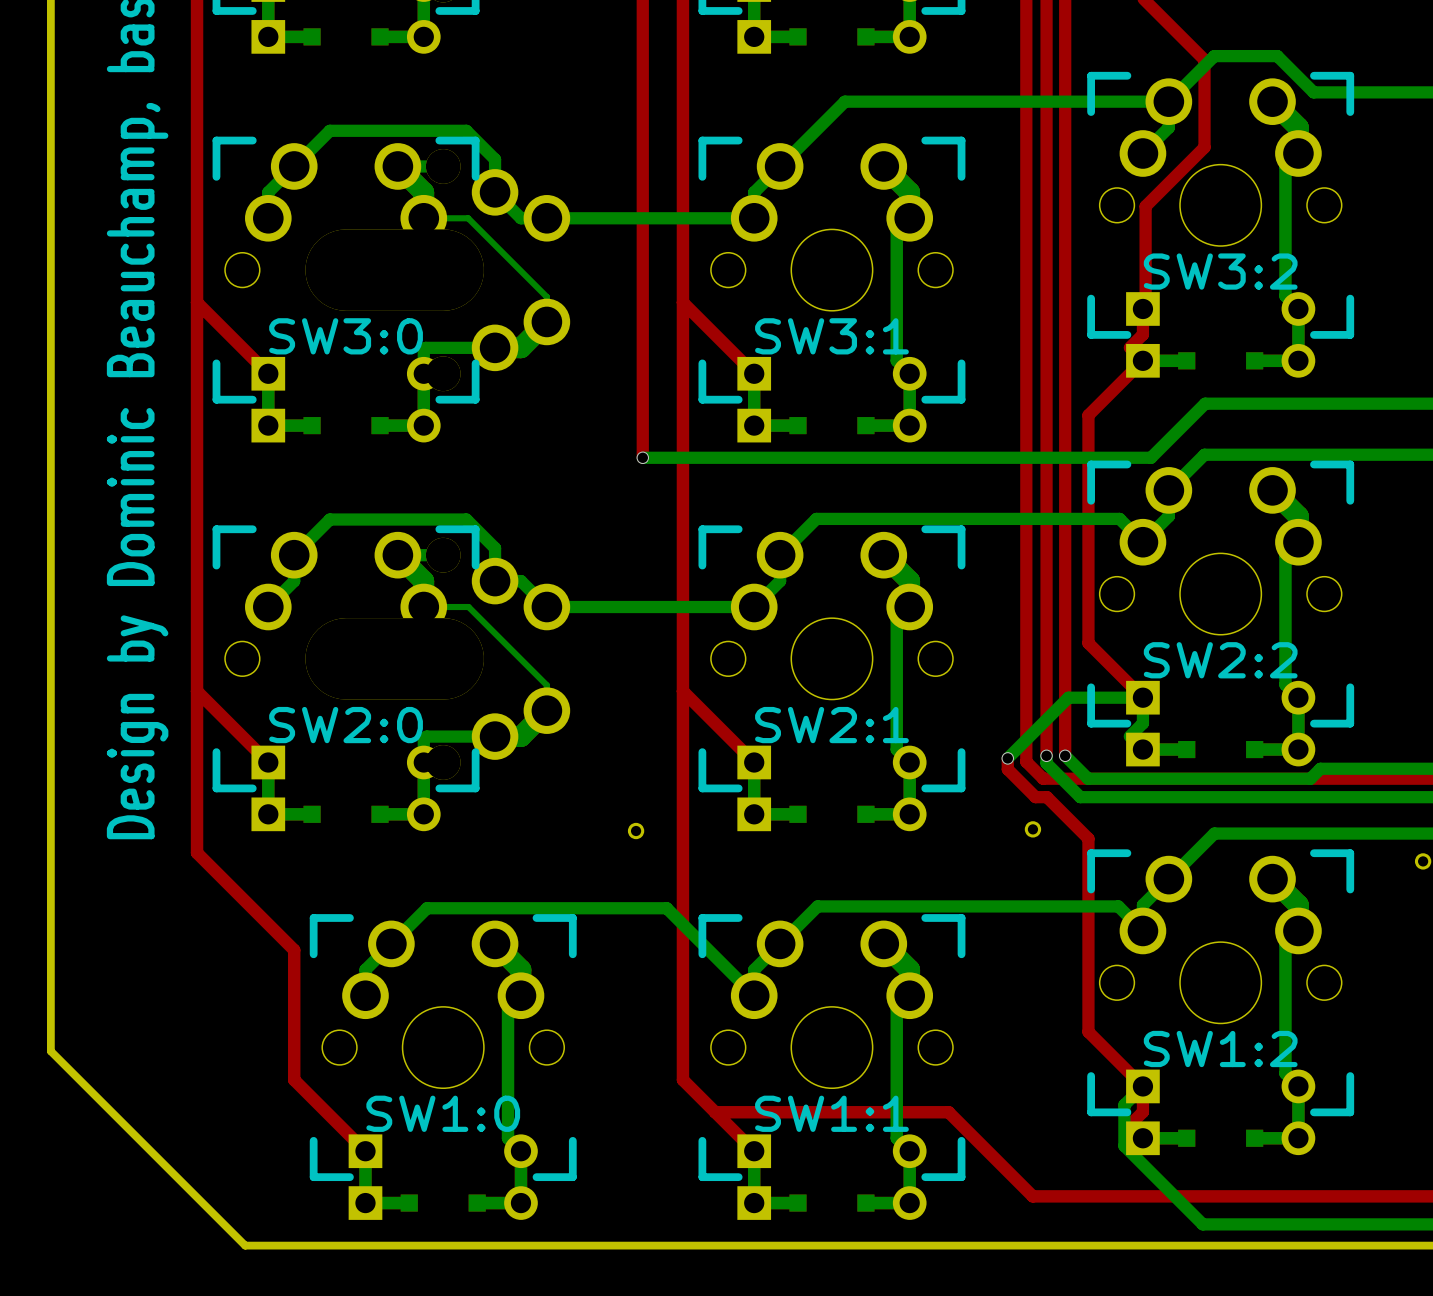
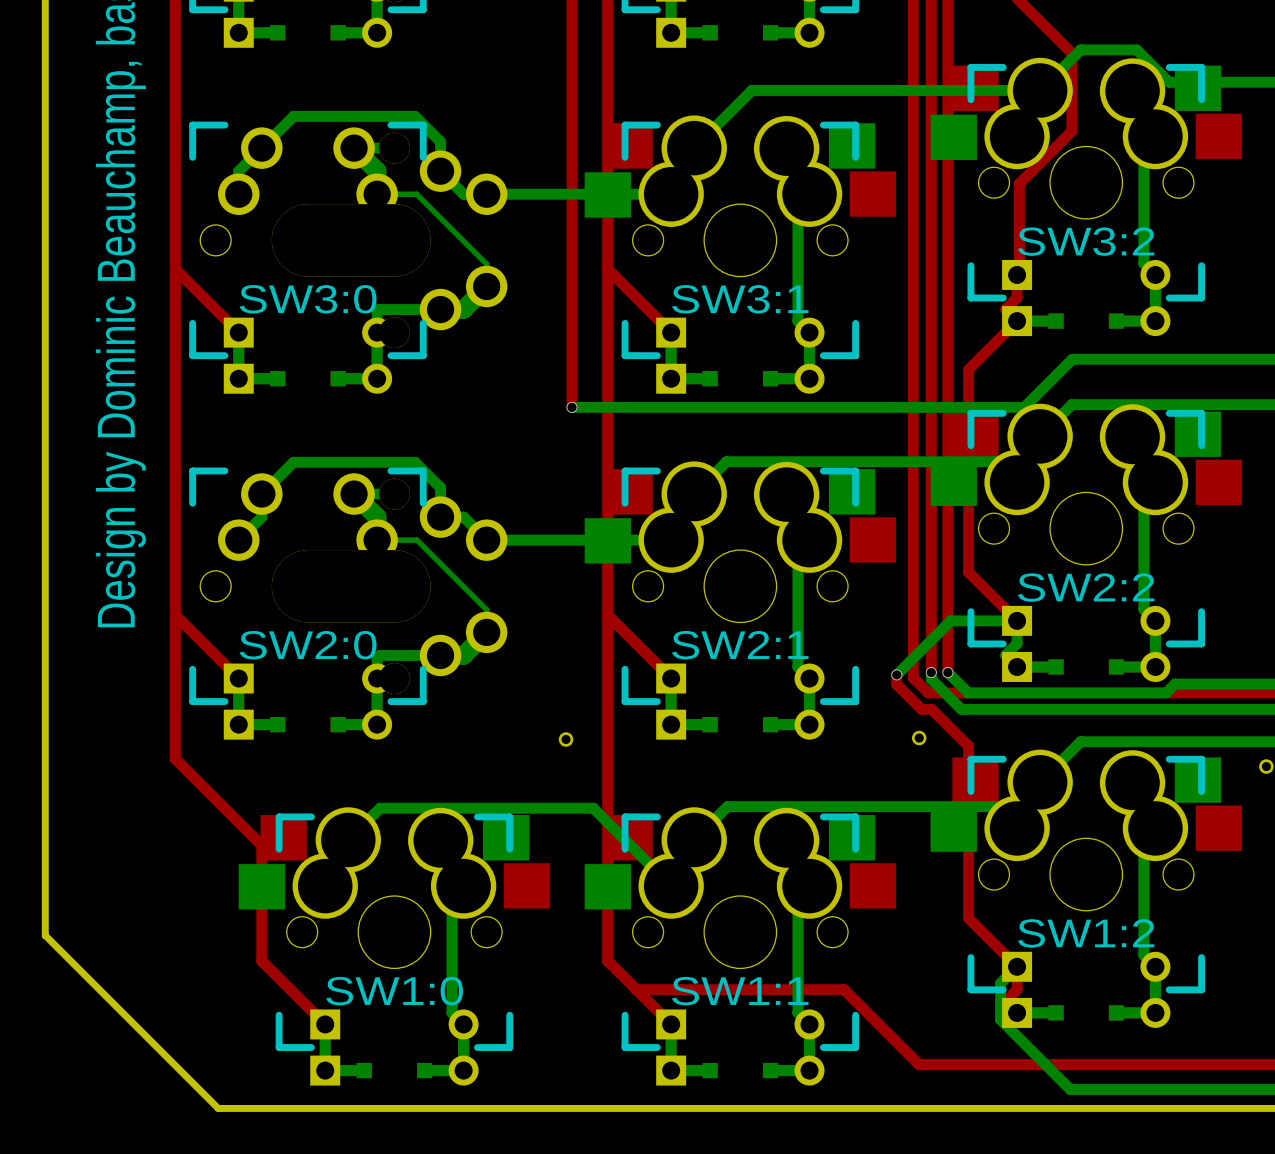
part footprint: [1087, 71, 1355, 378] -> [930, 57, 1242, 337]
part footprint: [698, 136, 966, 443] -> [584, 115, 897, 394]
part footprint: [1087, 460, 1355, 767] -> [930, 403, 1242, 682]
part footprint: [698, 525, 966, 832] -> [584, 461, 897, 740]
part footprint: [1087, 849, 1355, 1156] -> [930, 749, 1242, 1028]
part footprint: [309, 914, 577, 1220] -> [238, 807, 551, 1086]
part footprint: [698, 914, 966, 1220] -> [584, 807, 897, 1086]

